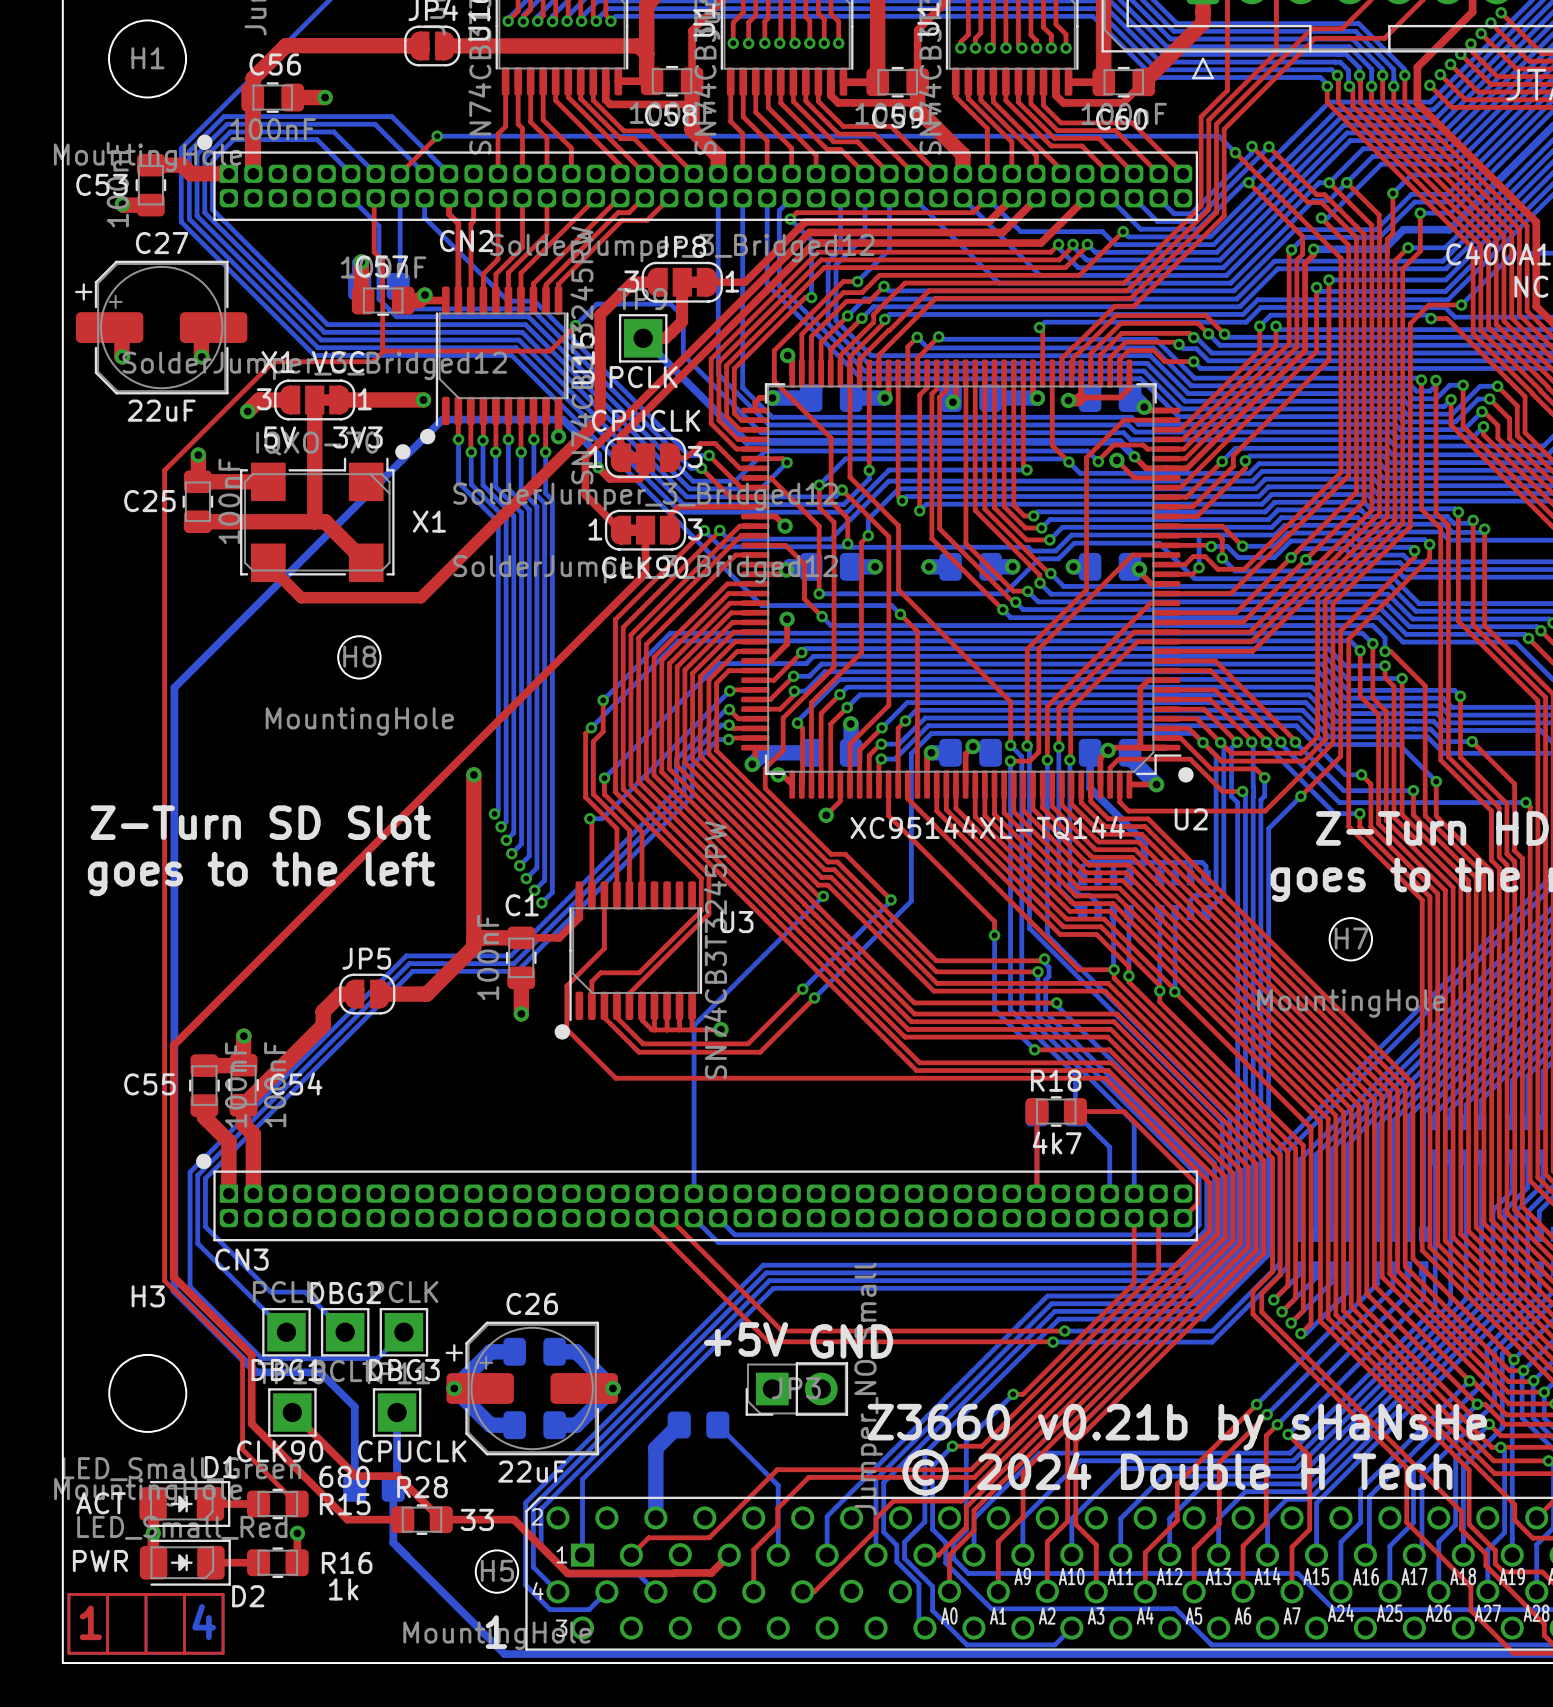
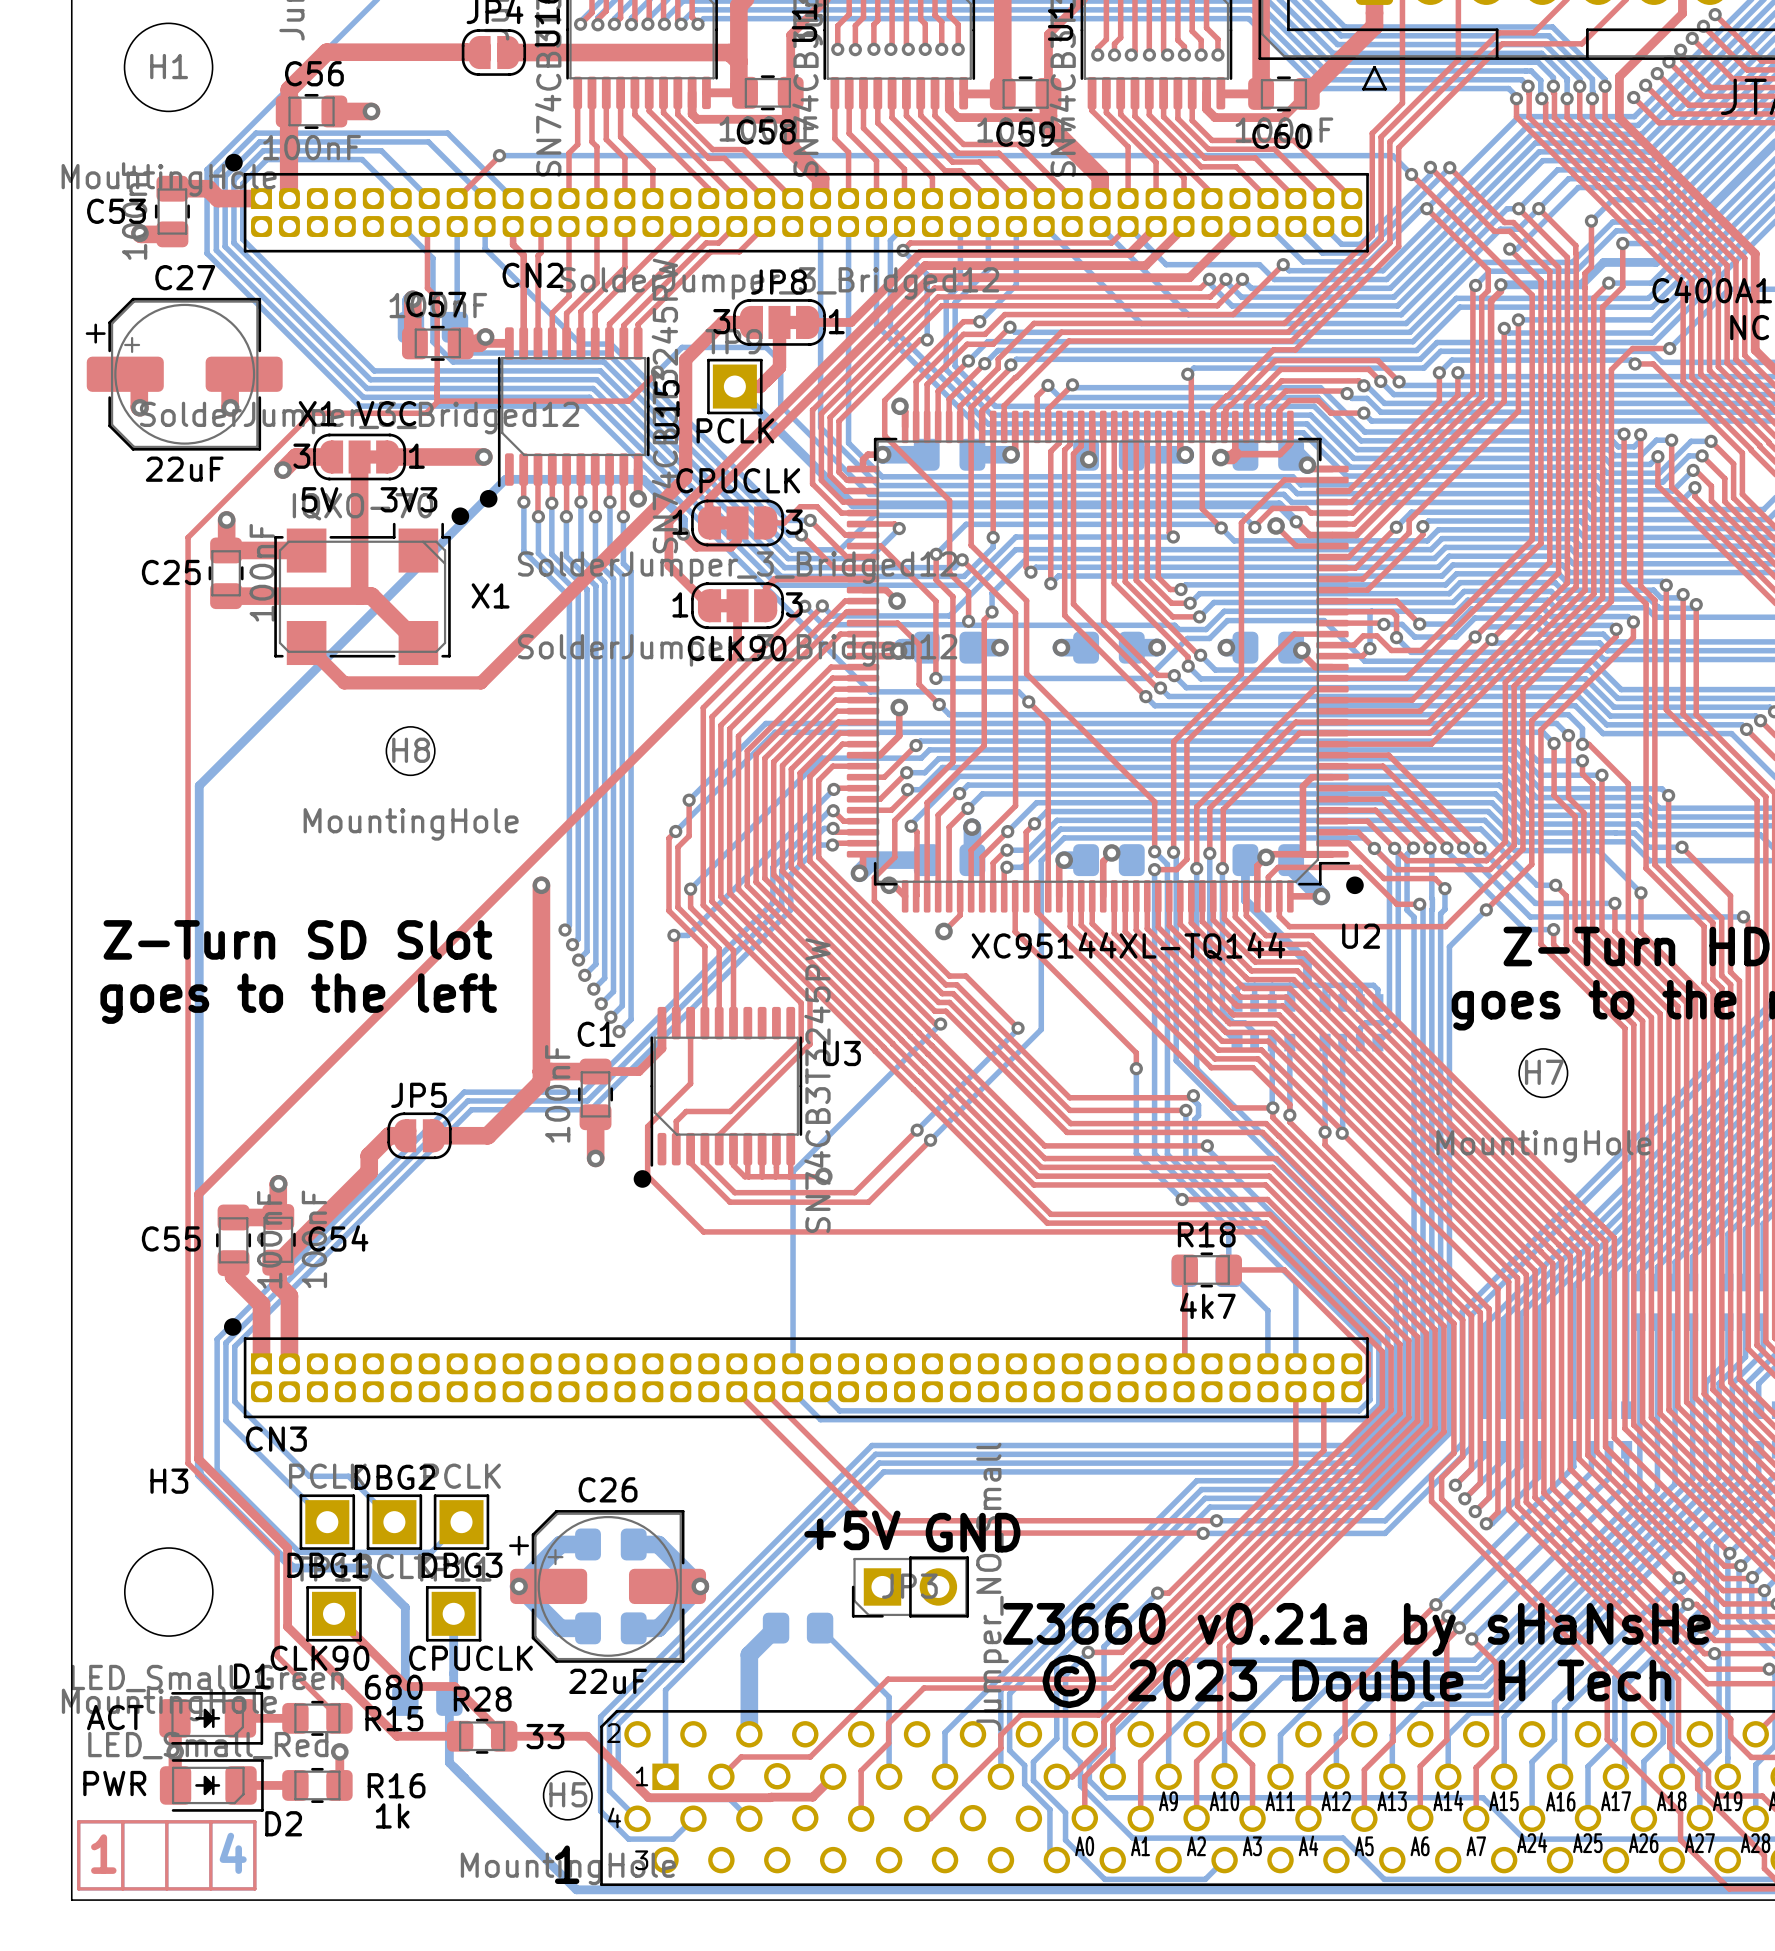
text: Z3660 v0.21b by sHaNsHe (1177, 1427) -> Z3660 v0.21a by sHaNsHe (1356, 1629)
text: © 2024 Double H Tech (1177, 1472) -> © 2023 Double H Tech (1356, 1681)

